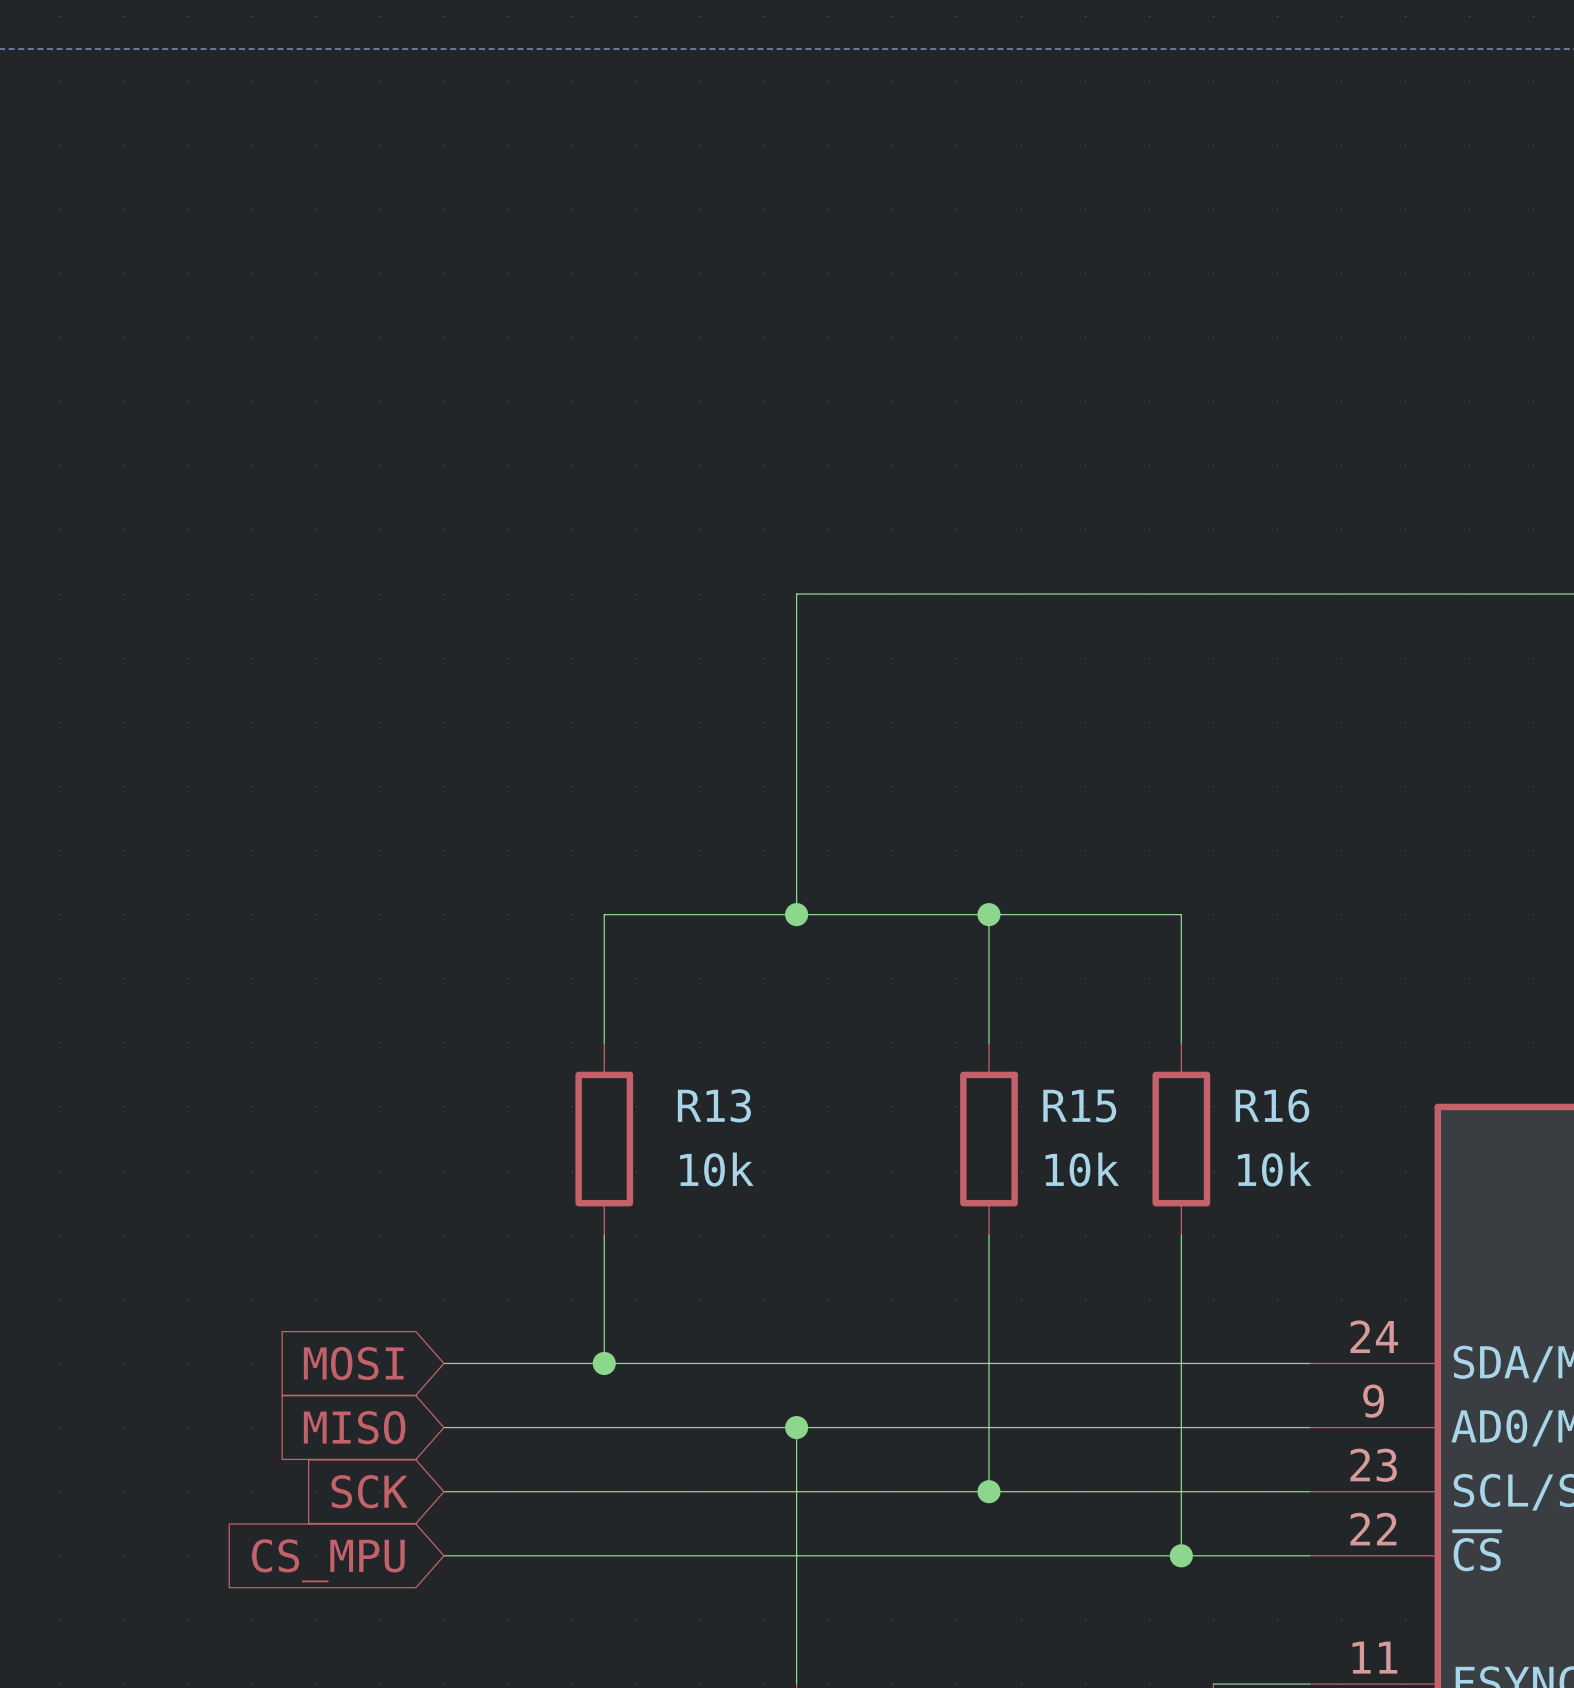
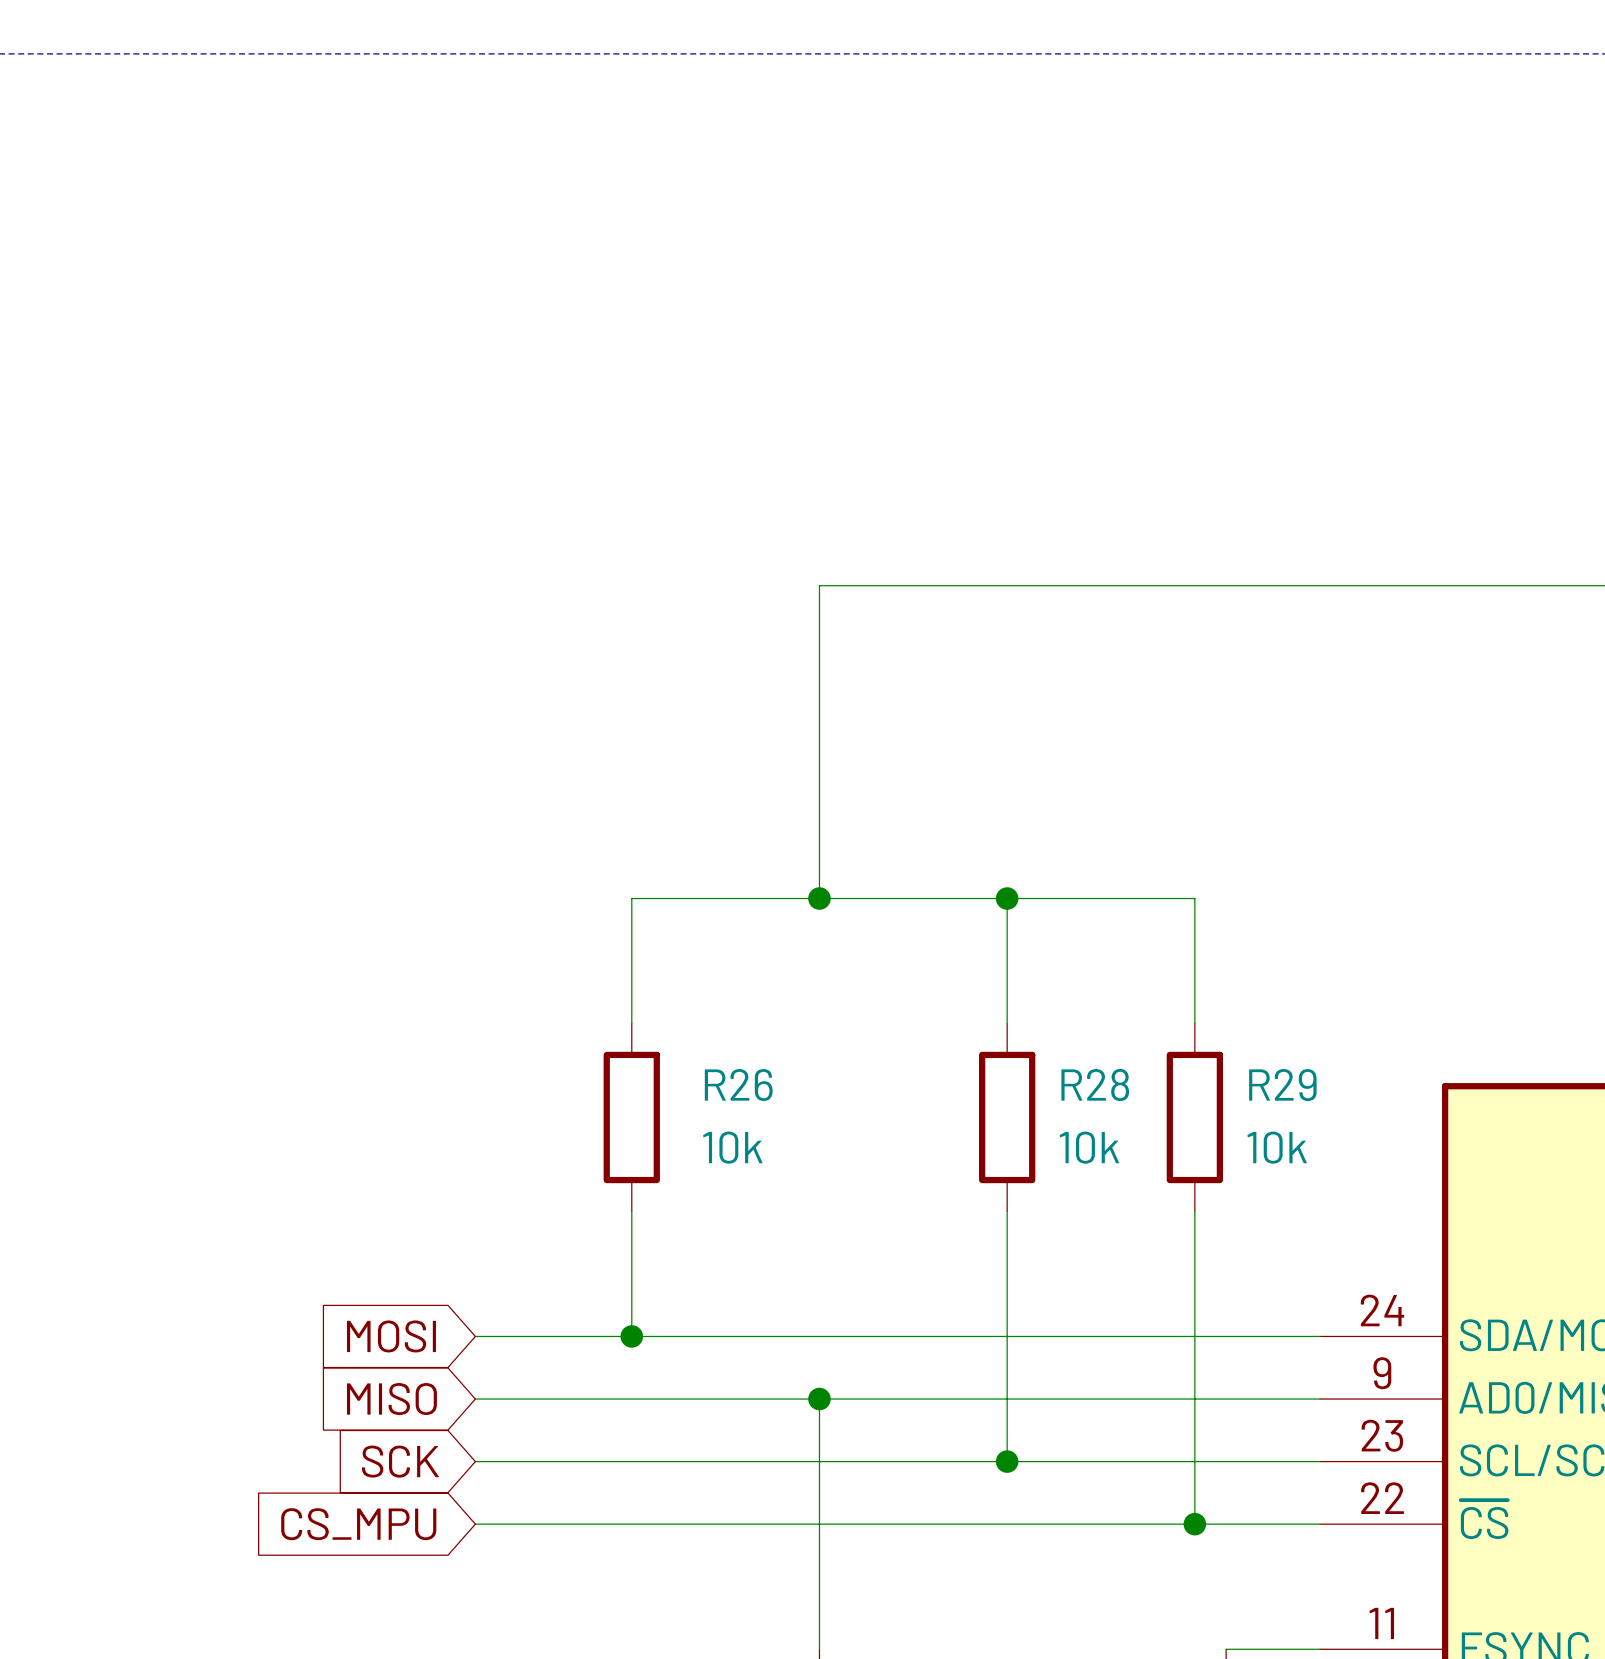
R13 name: R13 (714, 1105) -> R26 (738, 1085)
R16 name: R16 (1272, 1105) -> R29 (1282, 1085)
R15 name: R15 (1079, 1106) -> R28 (1095, 1084)

